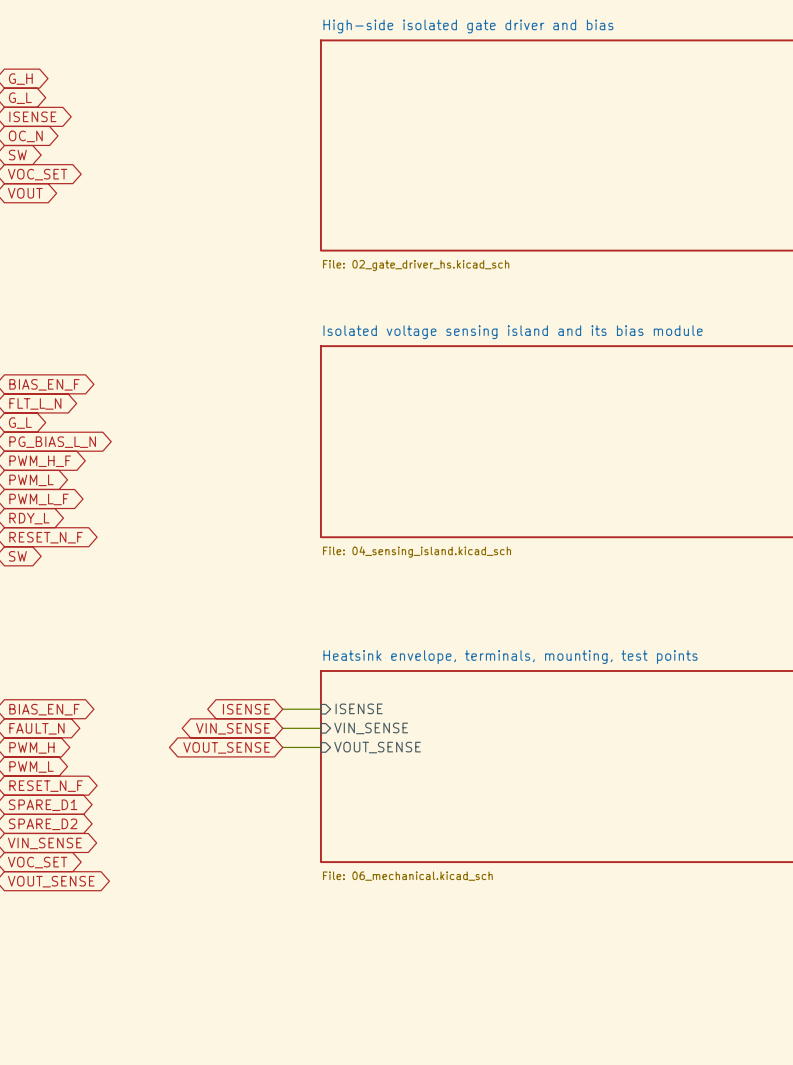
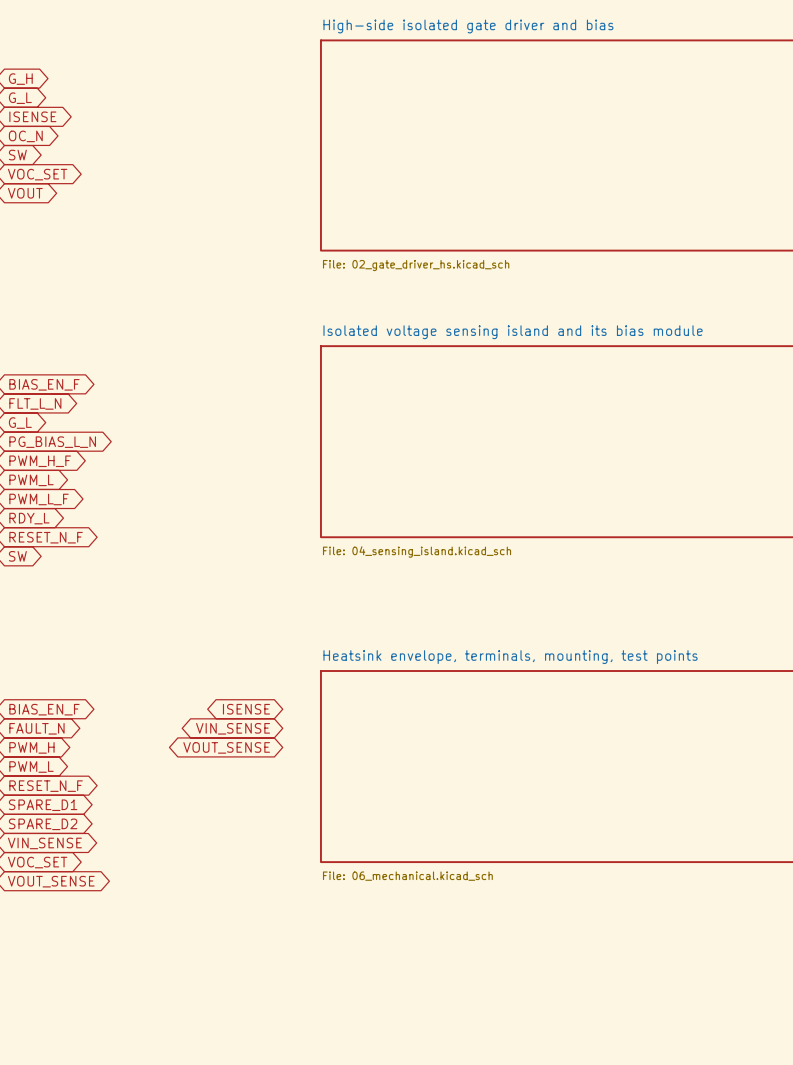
sheet pin: ISENSE (359, 708) -> none
wire: (282, 709) (320, 709) -> none
wire: (282, 728) (320, 728) -> none
sheet pin: VIN_SENSE (371, 728) -> none
wire: (282, 747) (320, 747) -> none
sheet pin: VOUT_SENSE (377, 747) -> none

